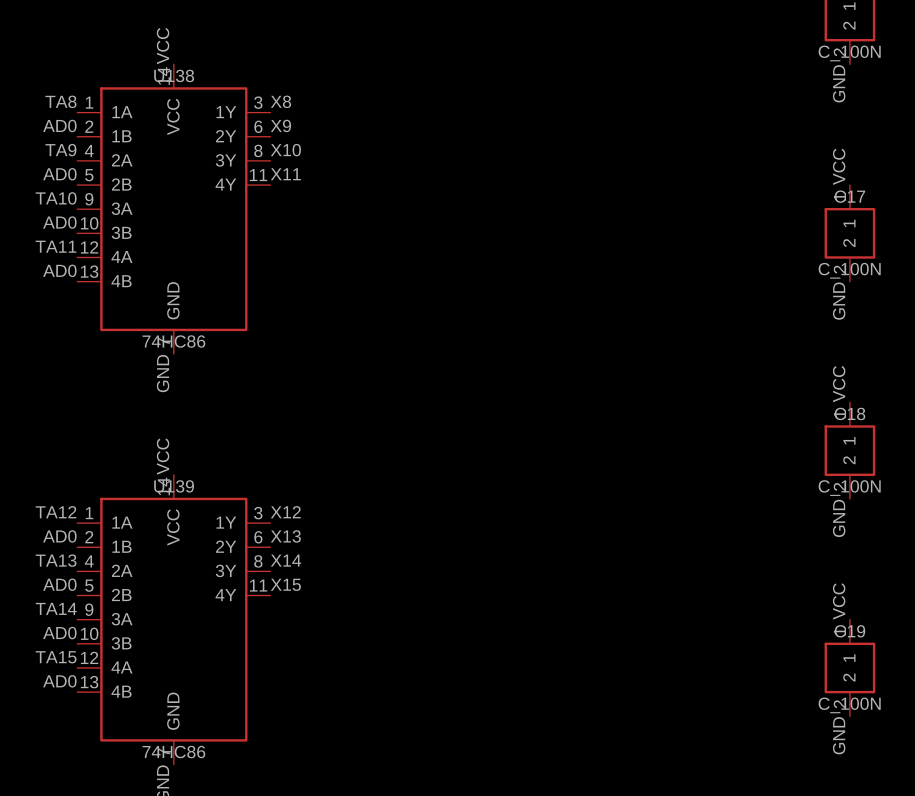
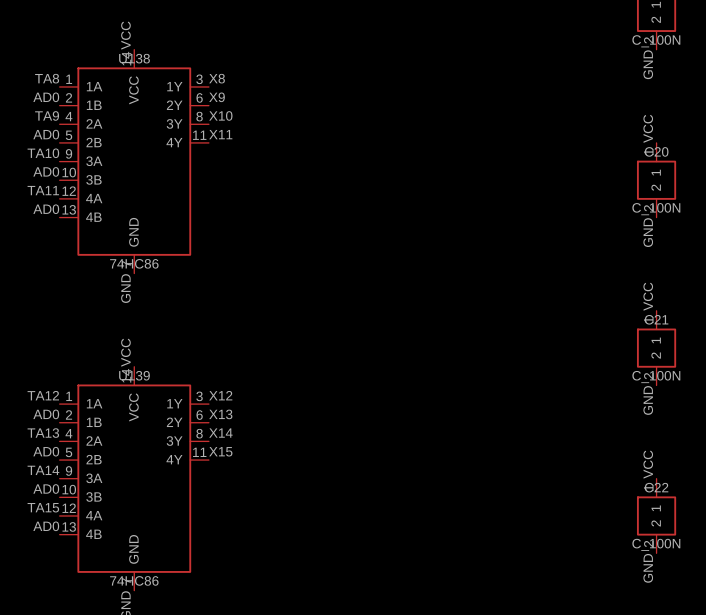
C17 name: C17 (849, 196) -> C20 (656, 151)
C18 name: C18 (849, 413) -> C21 (656, 319)
C19 name: C19 (849, 631) -> C22 (656, 487)

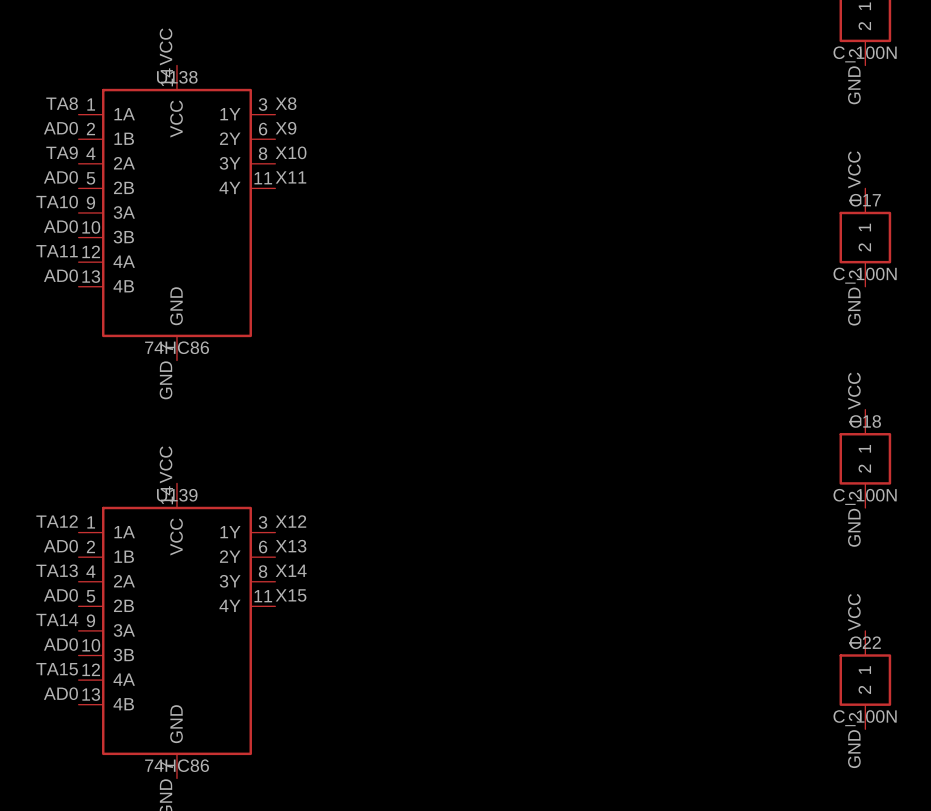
C20 name: C20 (656, 151) -> C17 (865, 200)
C21 name: C21 (656, 319) -> C18 (865, 421)

